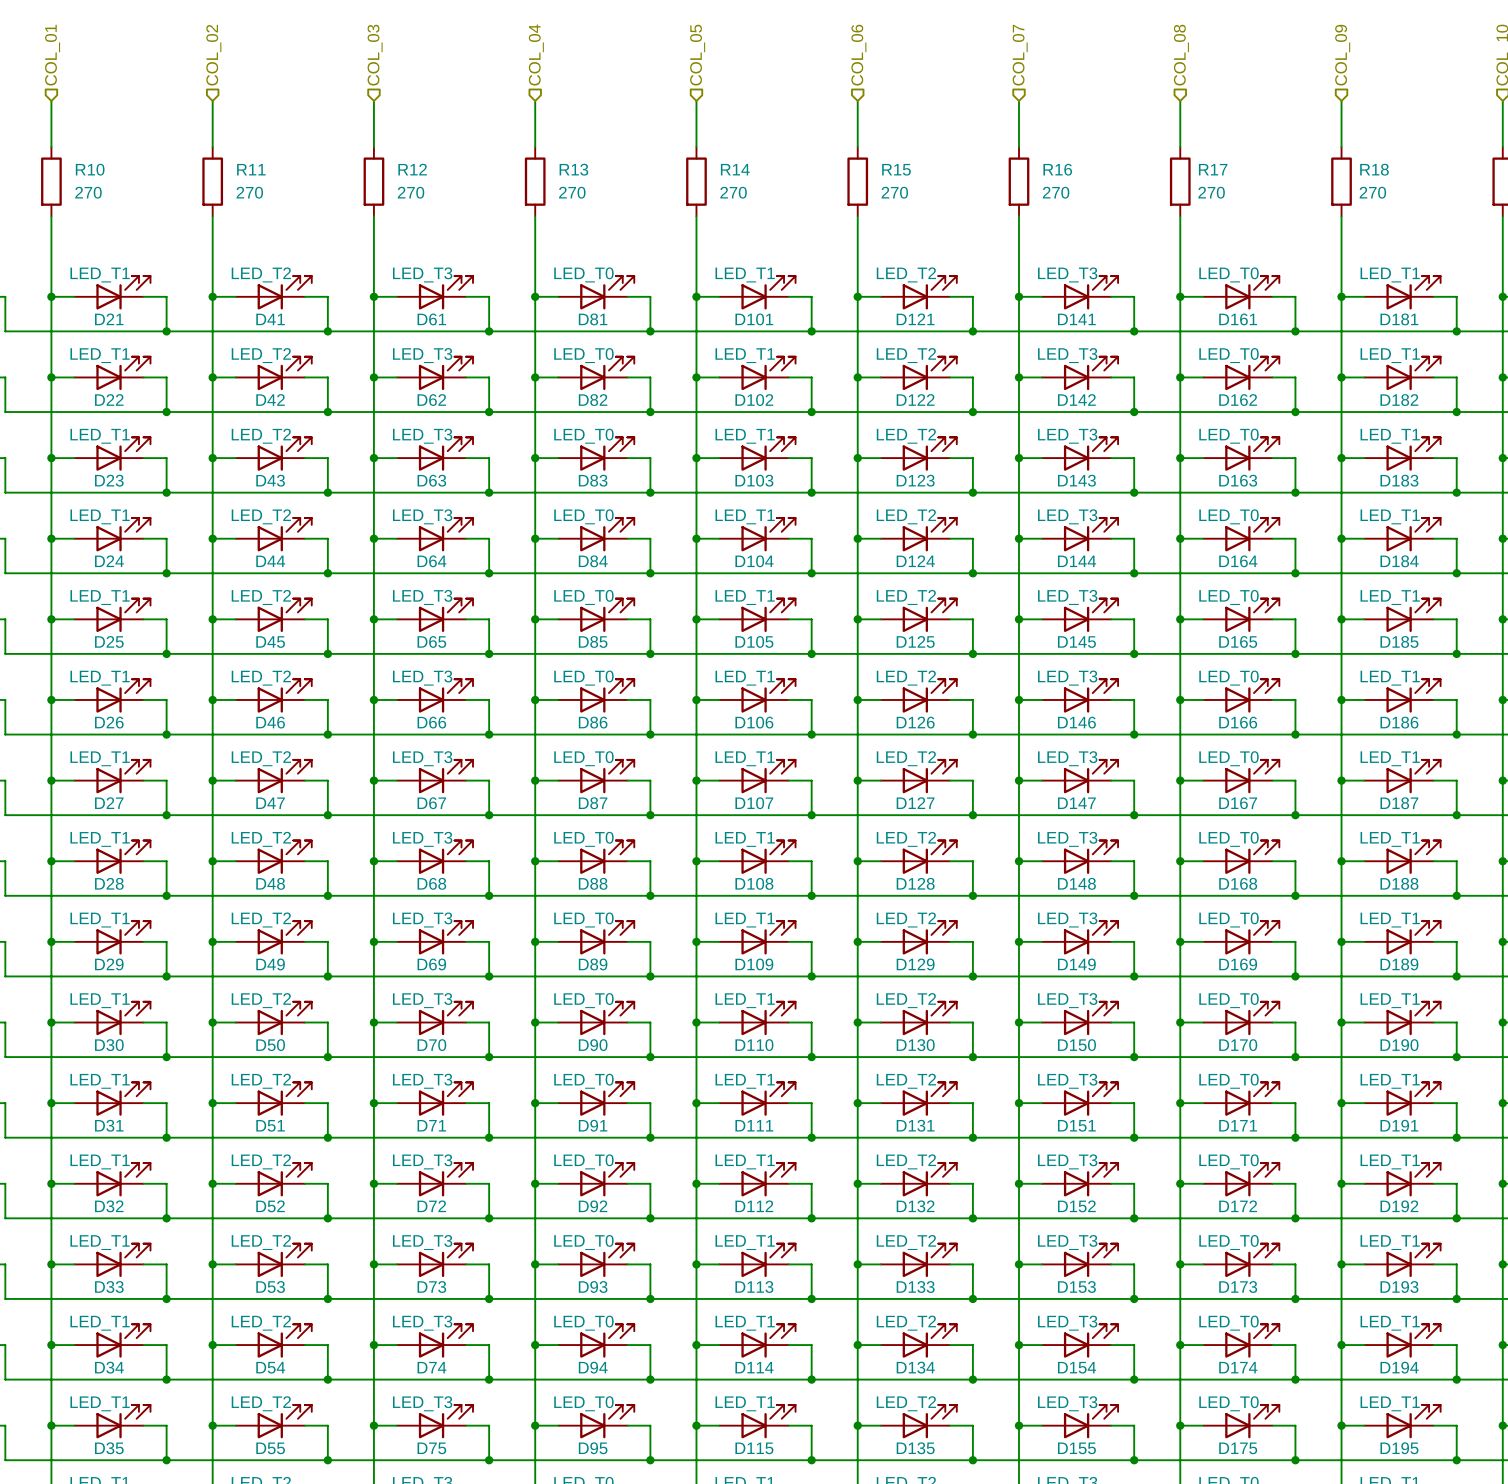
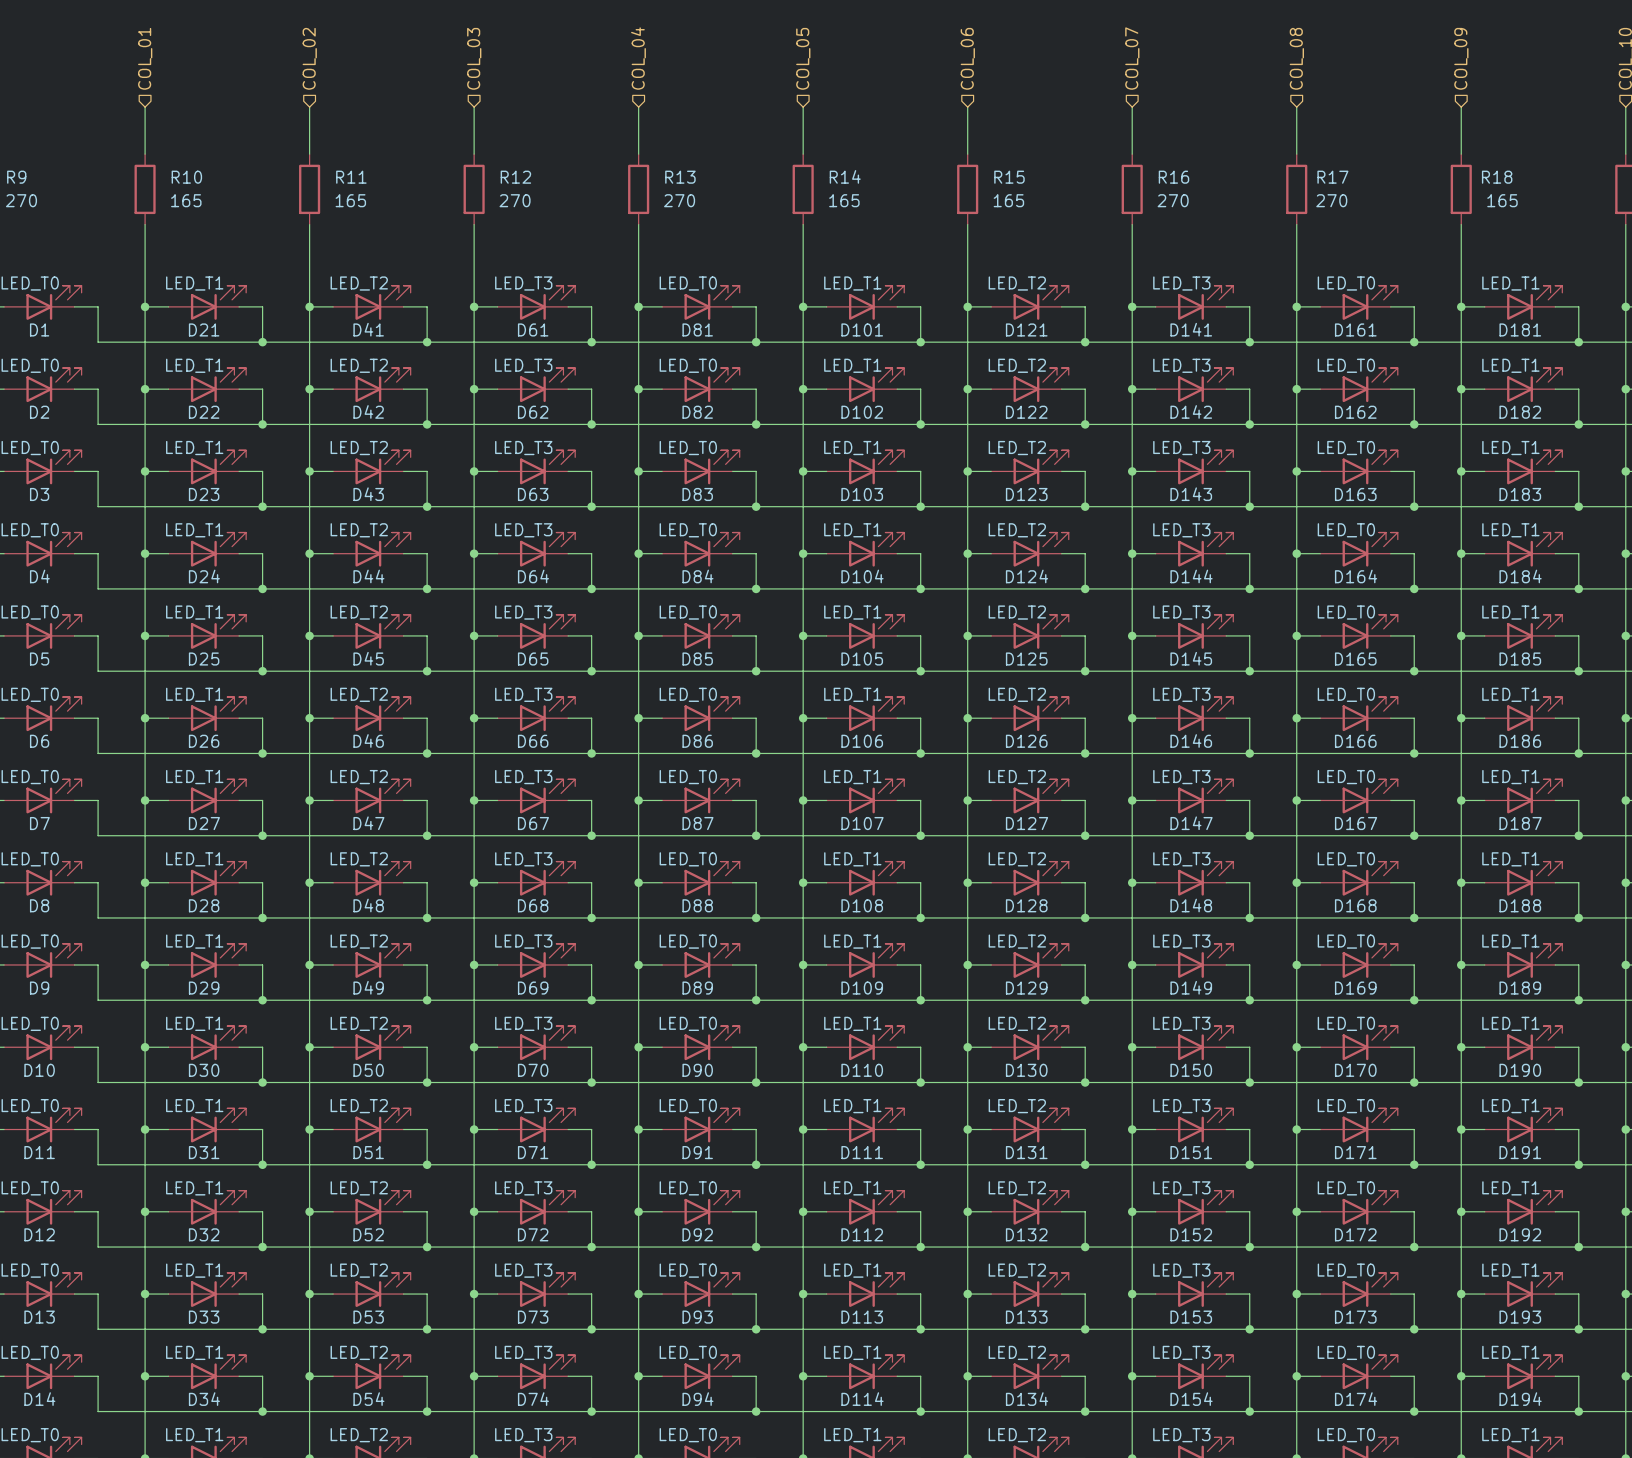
R10 value: 270 (88, 192) -> 165 (186, 200)
R11 value: 270 (249, 192) -> 165 (350, 200)
R14 value: 270 (733, 192) -> 165 (844, 200)
R15 value: 270 (894, 192) -> 165 (1008, 200)
R18 value: 270 (1372, 192) -> 165 (1502, 200)

